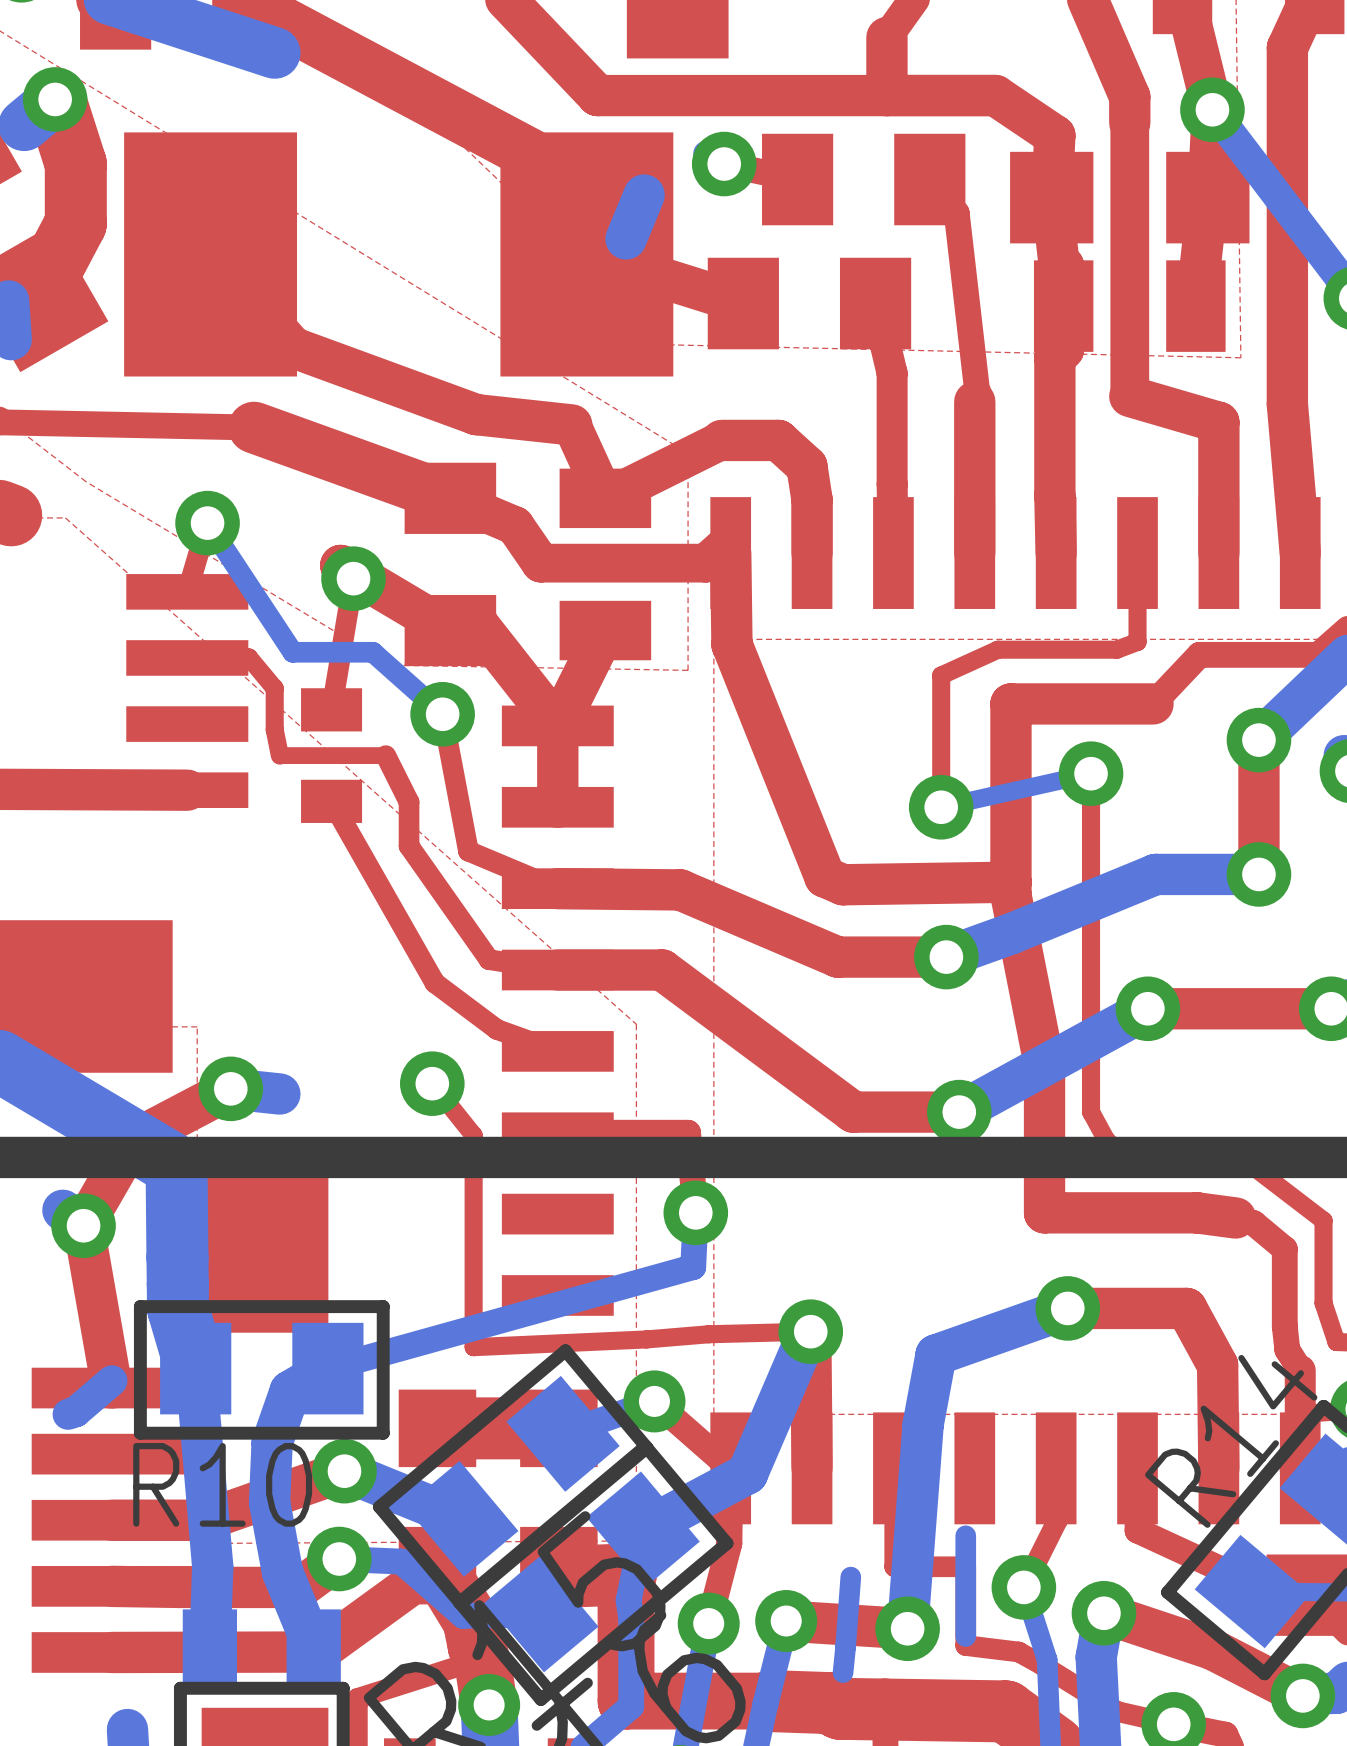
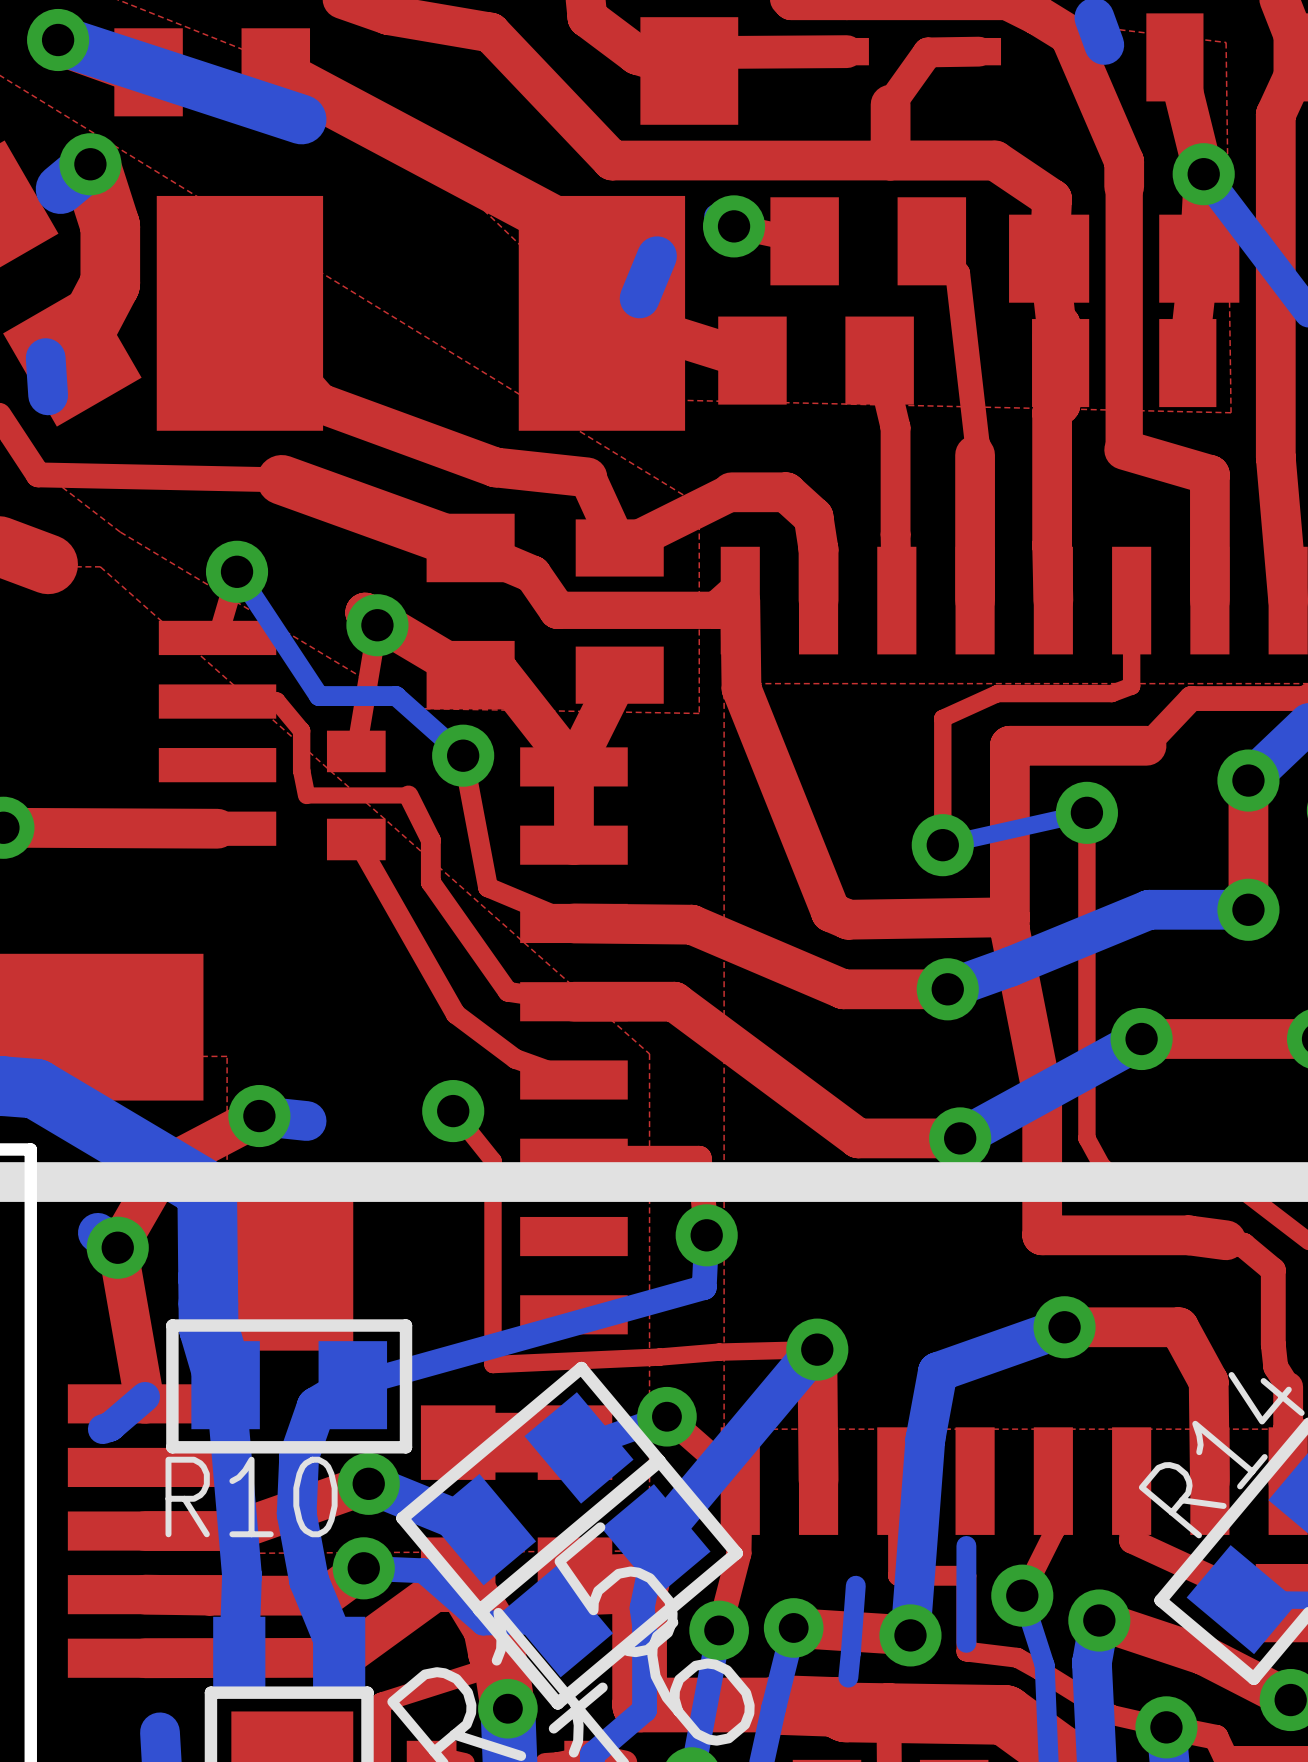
bottom track: (808, 1332) (747, 1473) (643, 1529) -> (814, 1350) (656, 1539)

